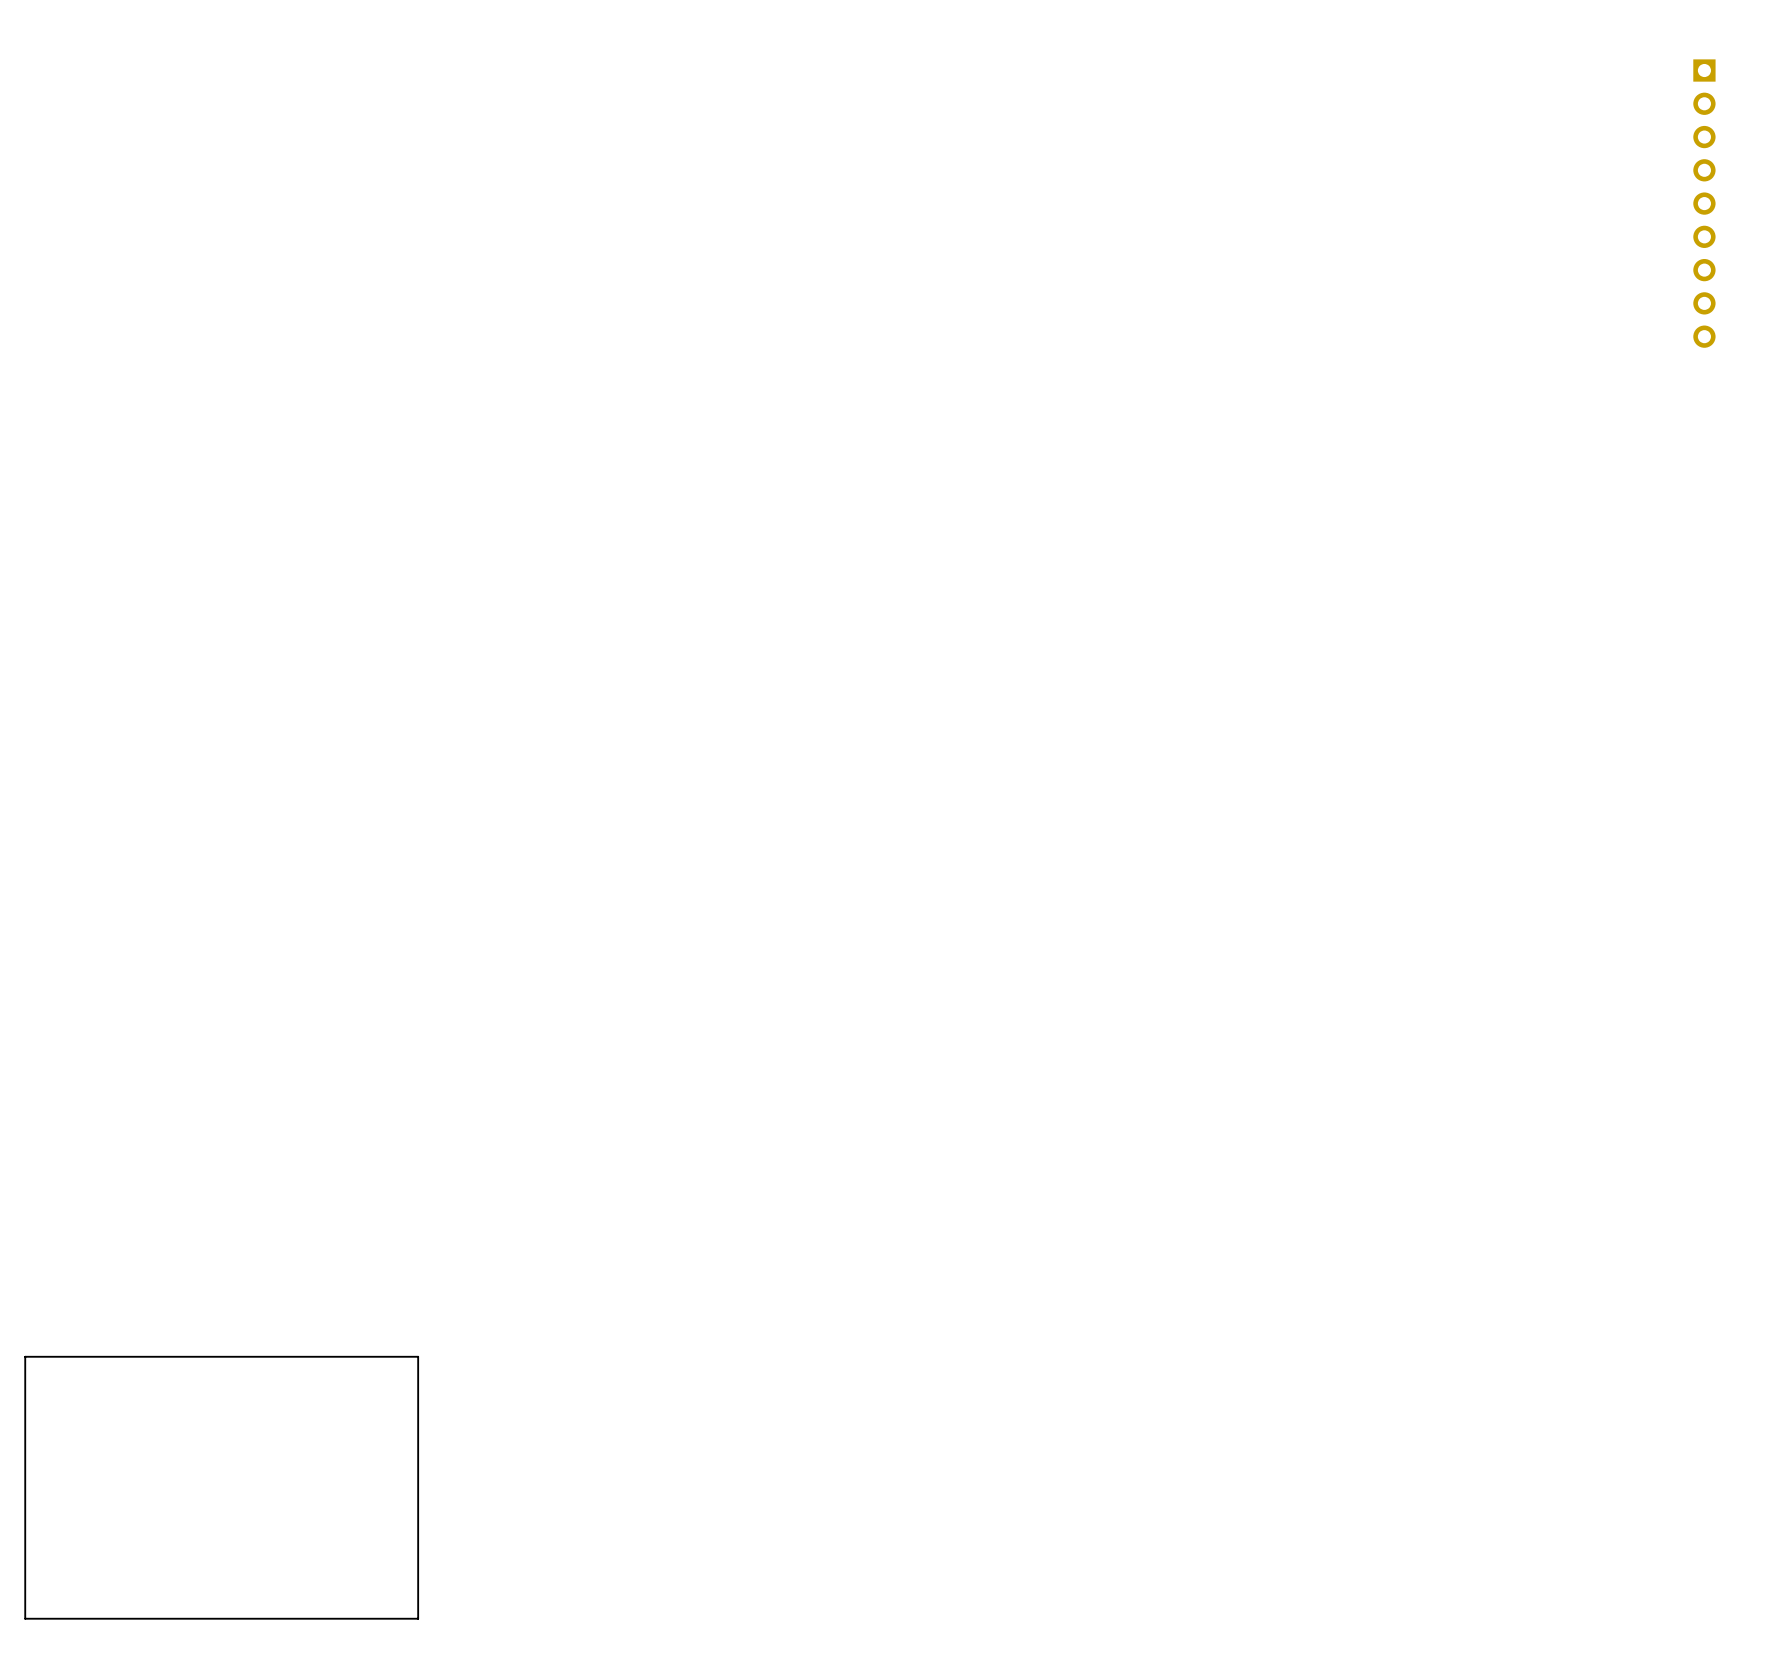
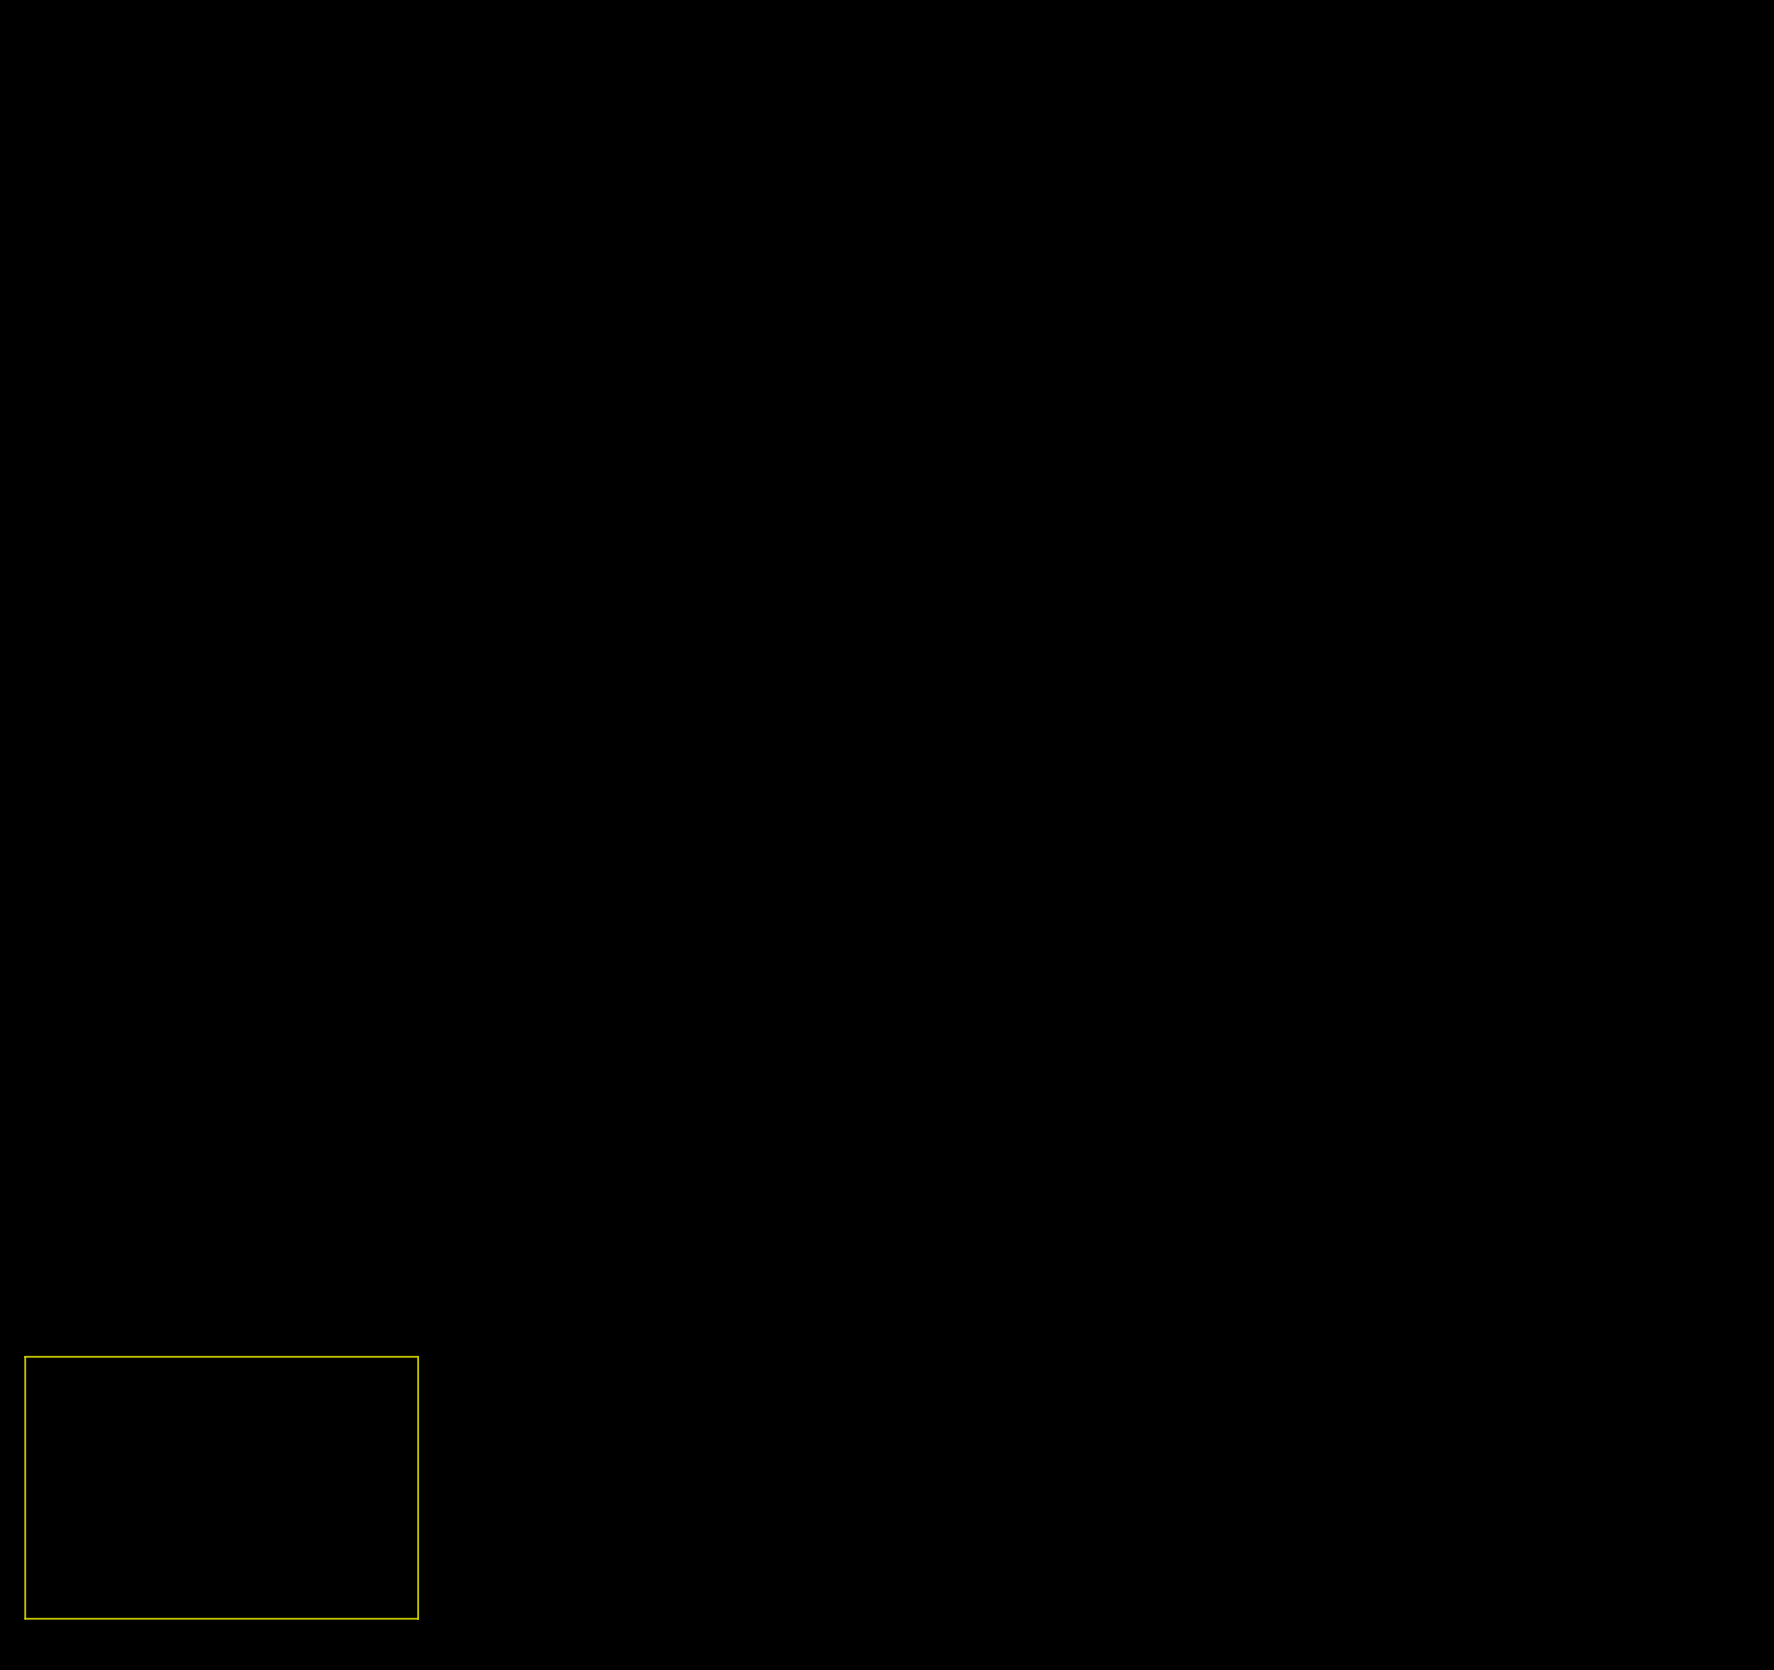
part: (1704, 203) -> none

